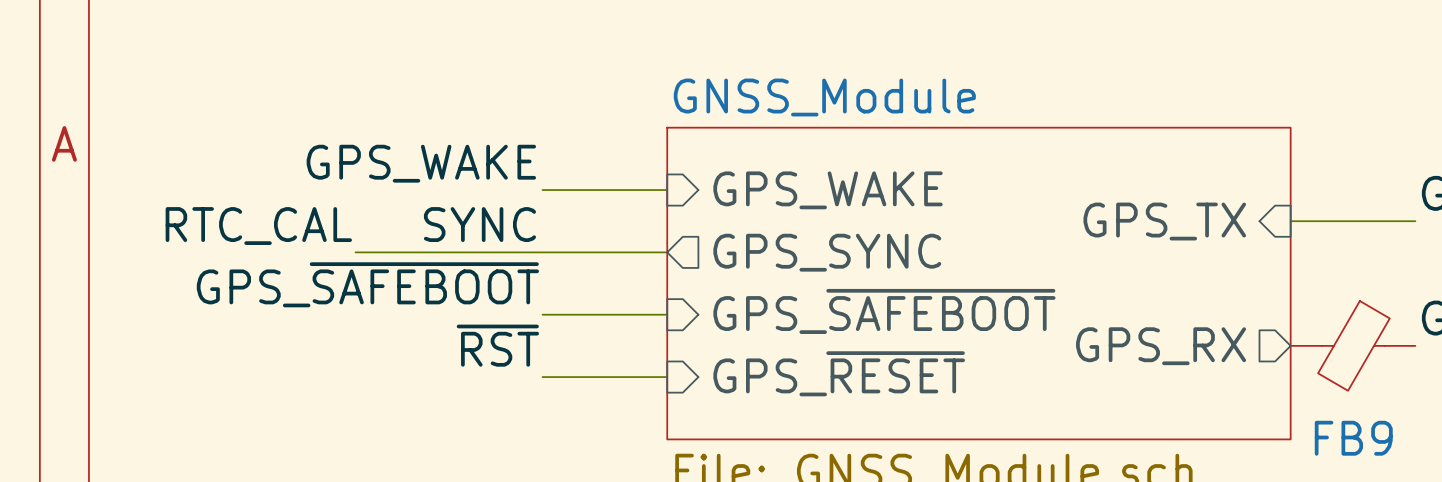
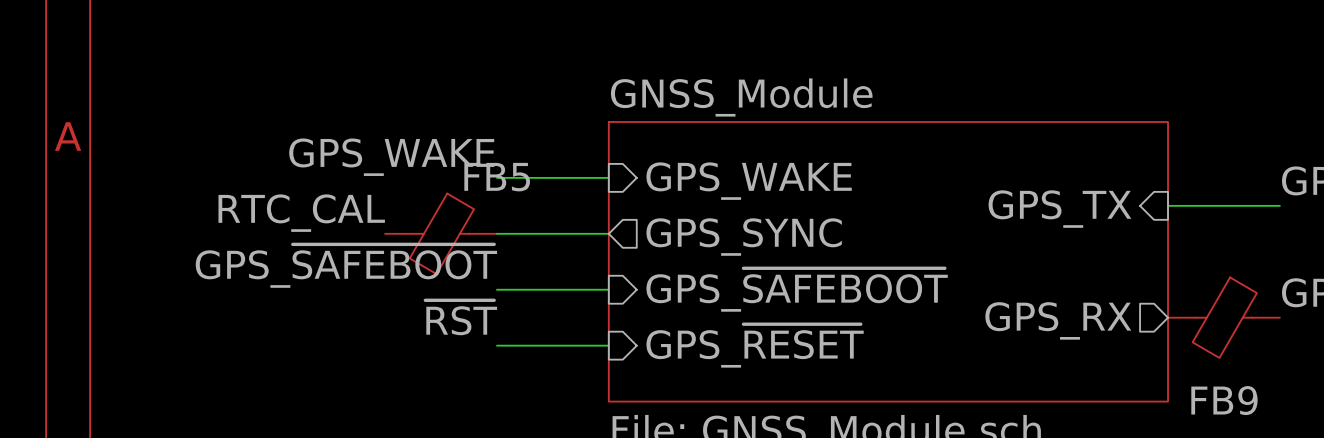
label: SYNC (479, 224) -> none
label position: RTC_CAL (258, 226) -> RTC_CAL (301, 213)
wire: (355, 252) (542, 252) -> none
FB5: none -> (441, 233)

